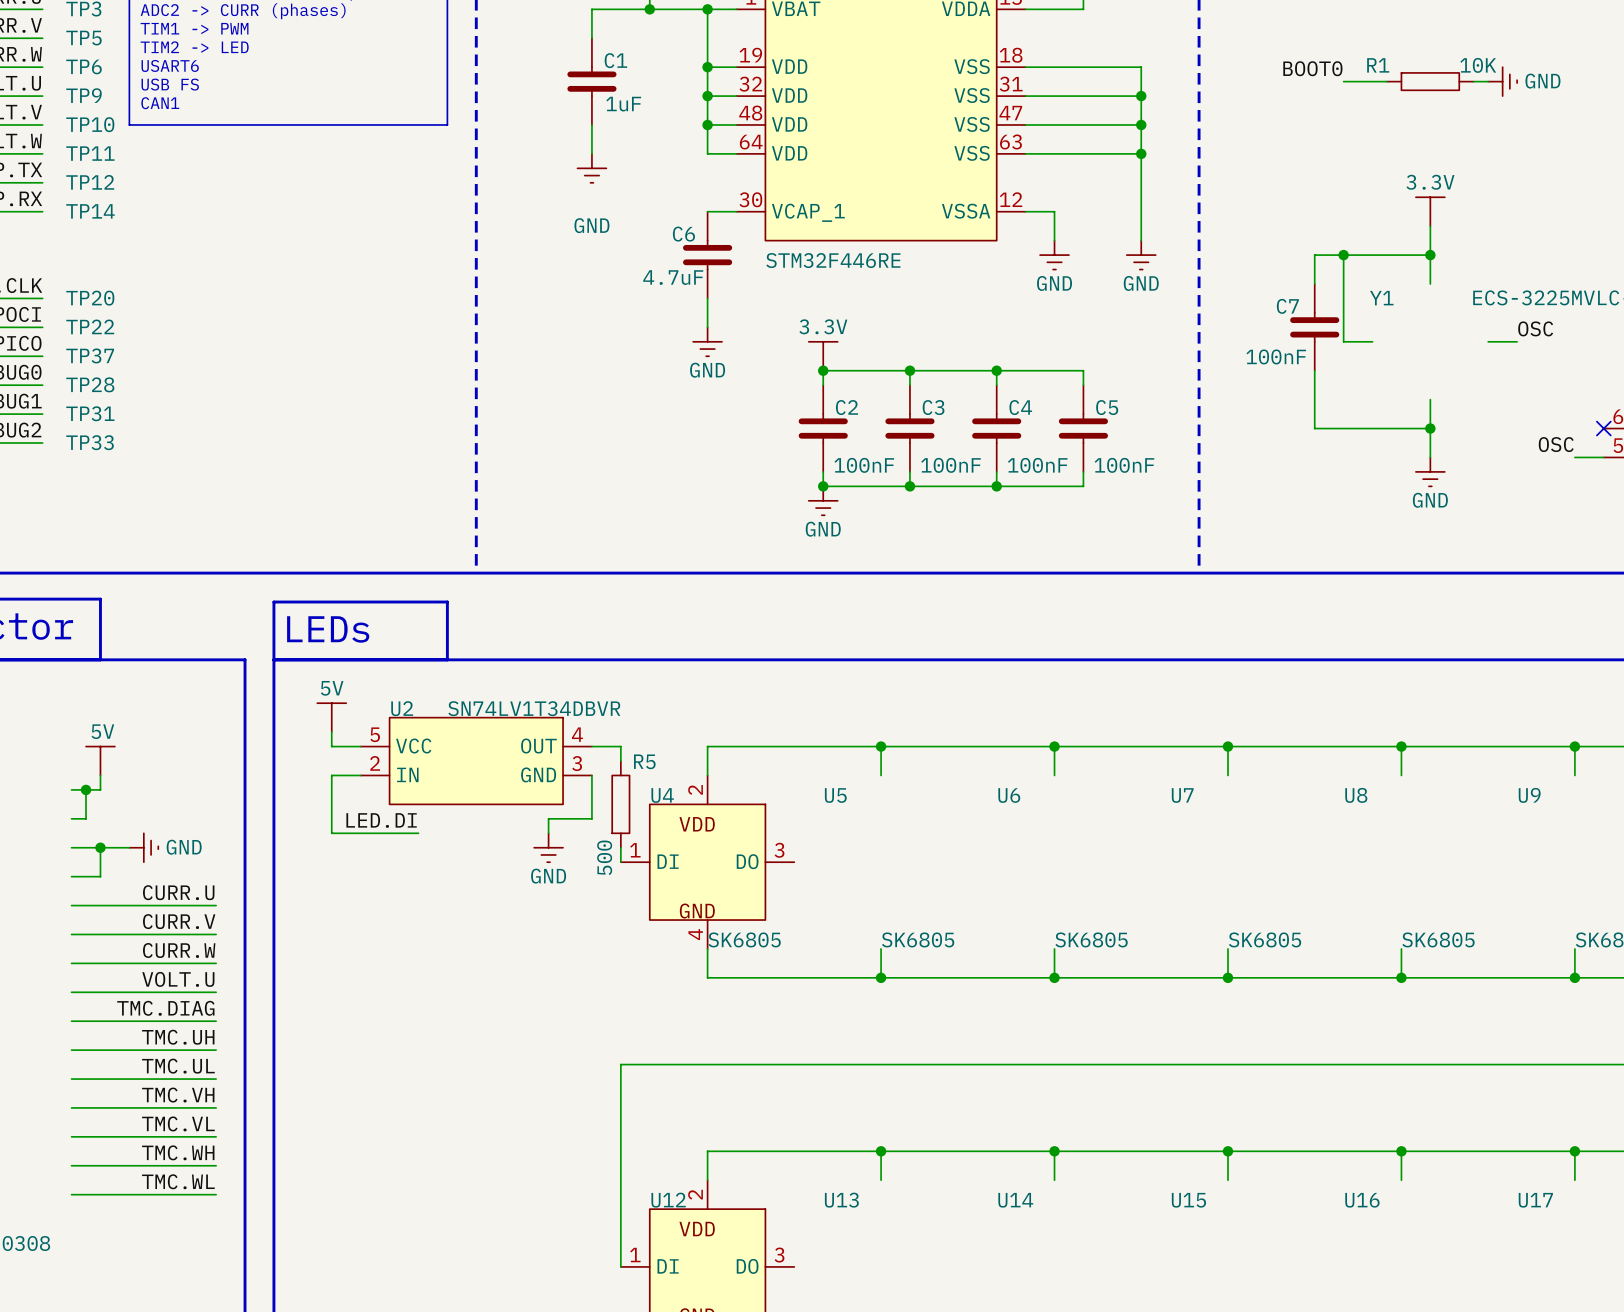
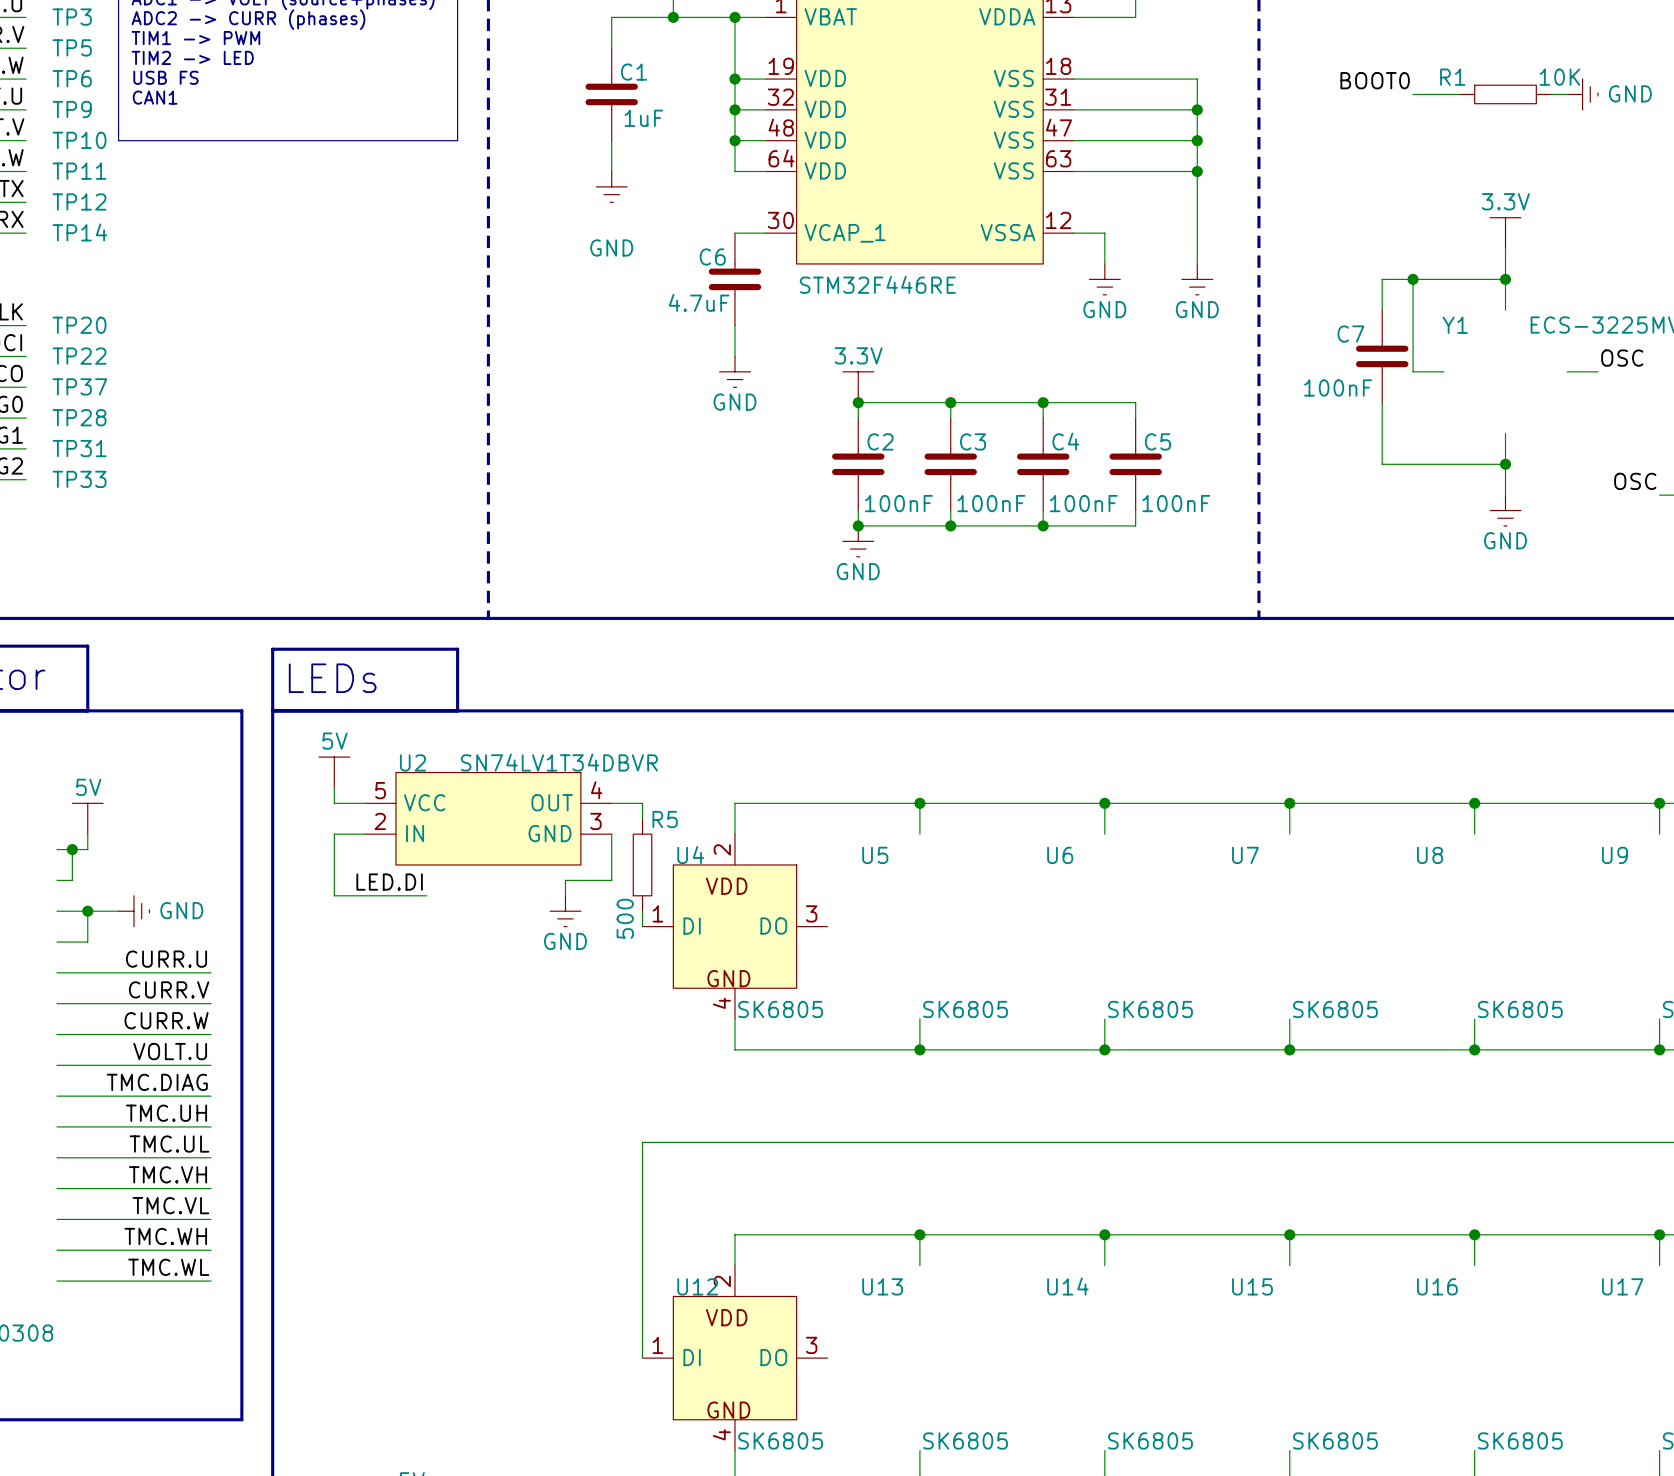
text: USART6 (170, 65) -> USB FS (165, 77)
text: USB FS (170, 84) -> CAN1 (155, 97)
text: CAN1 (160, 103) -> none

